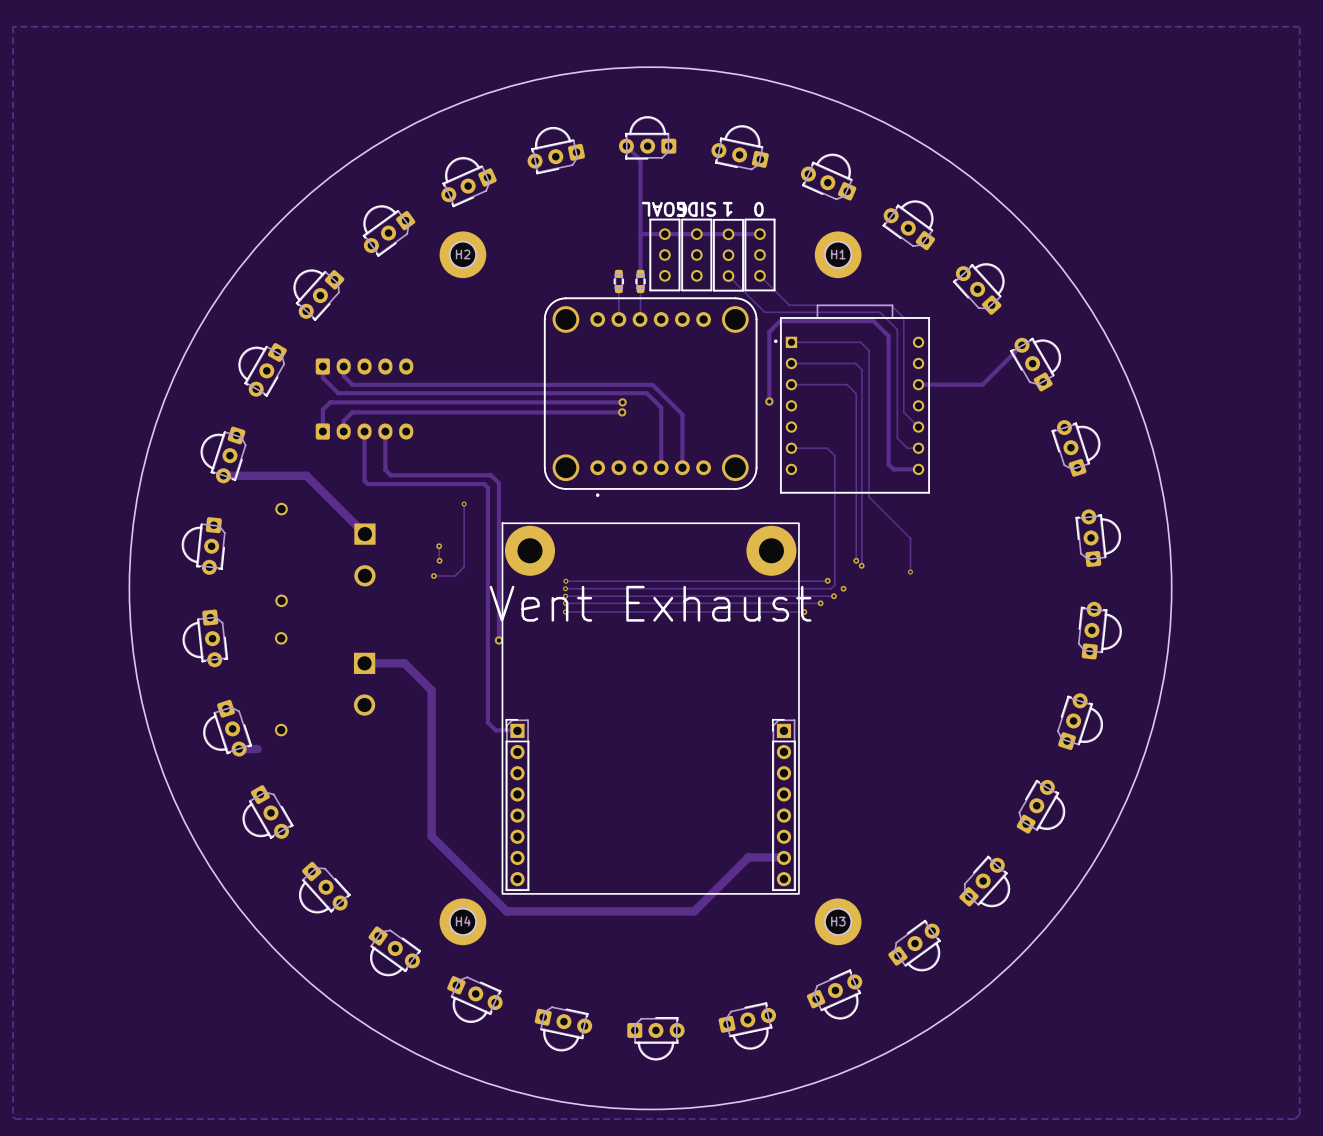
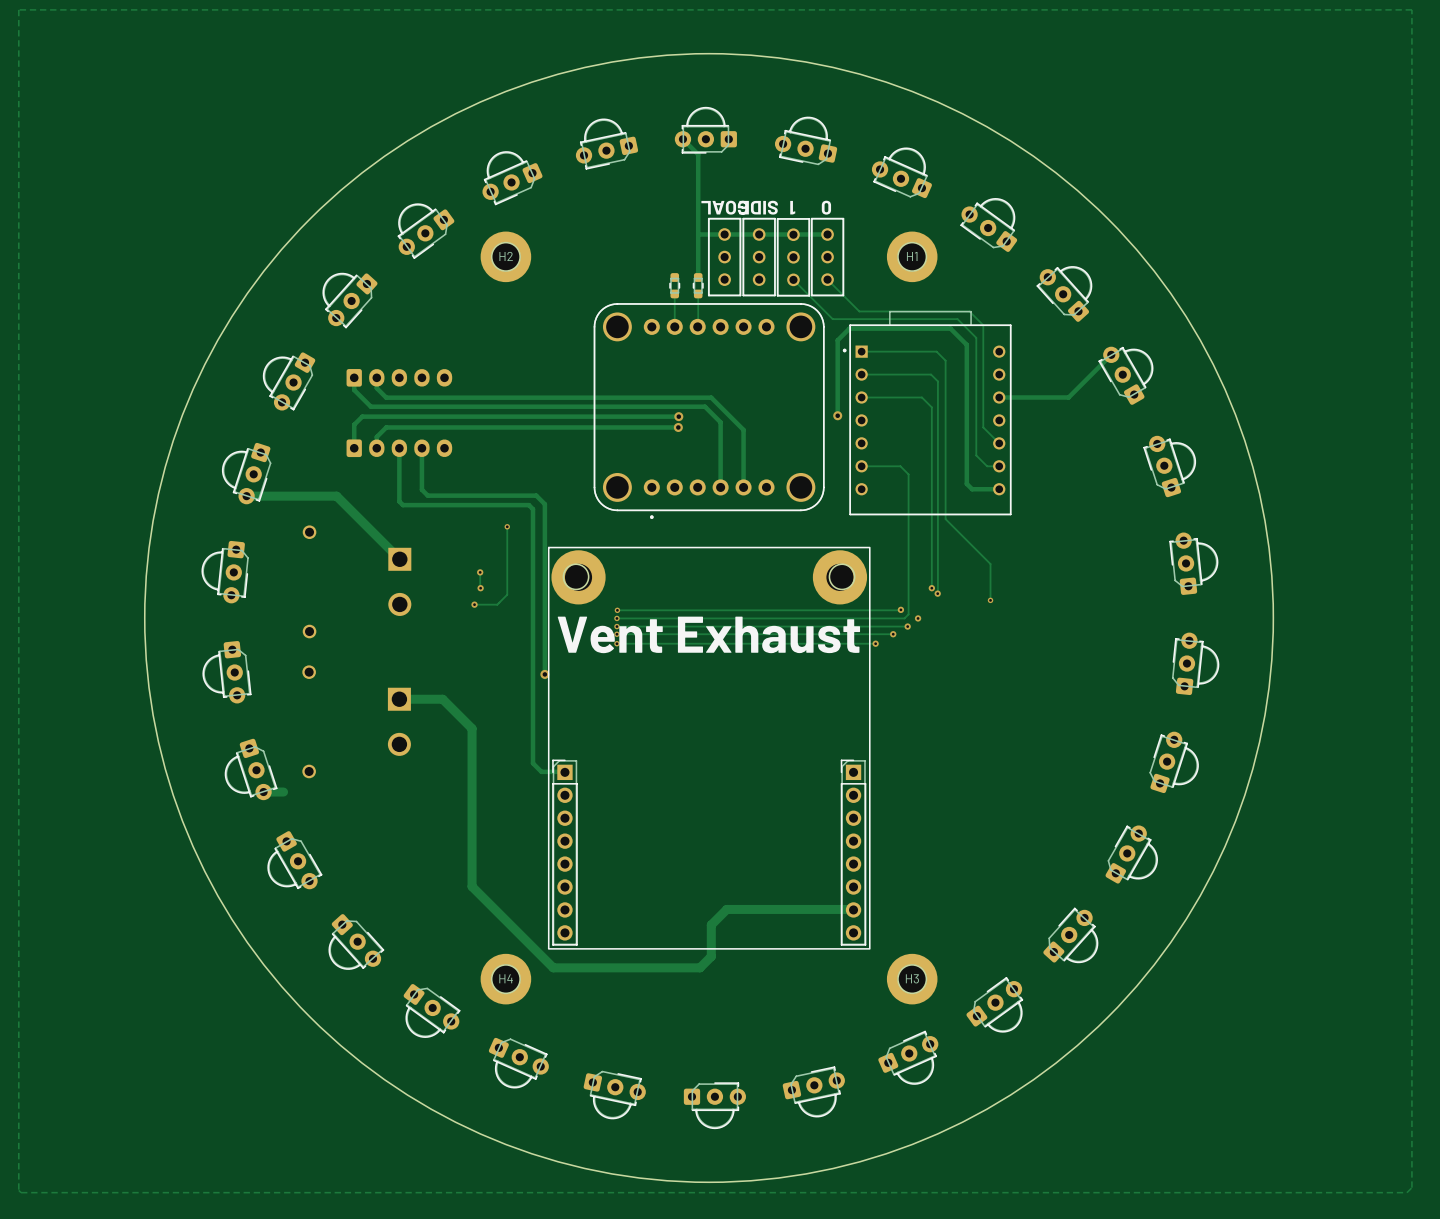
round board edge: none -> [563, 564, 589, 590]
round board edge: none -> [829, 564, 855, 590]
track: (748, 857) (694, 911) (642, 911) -> (814, 909) (726, 909) (711, 924) (711, 956) (700, 967)

